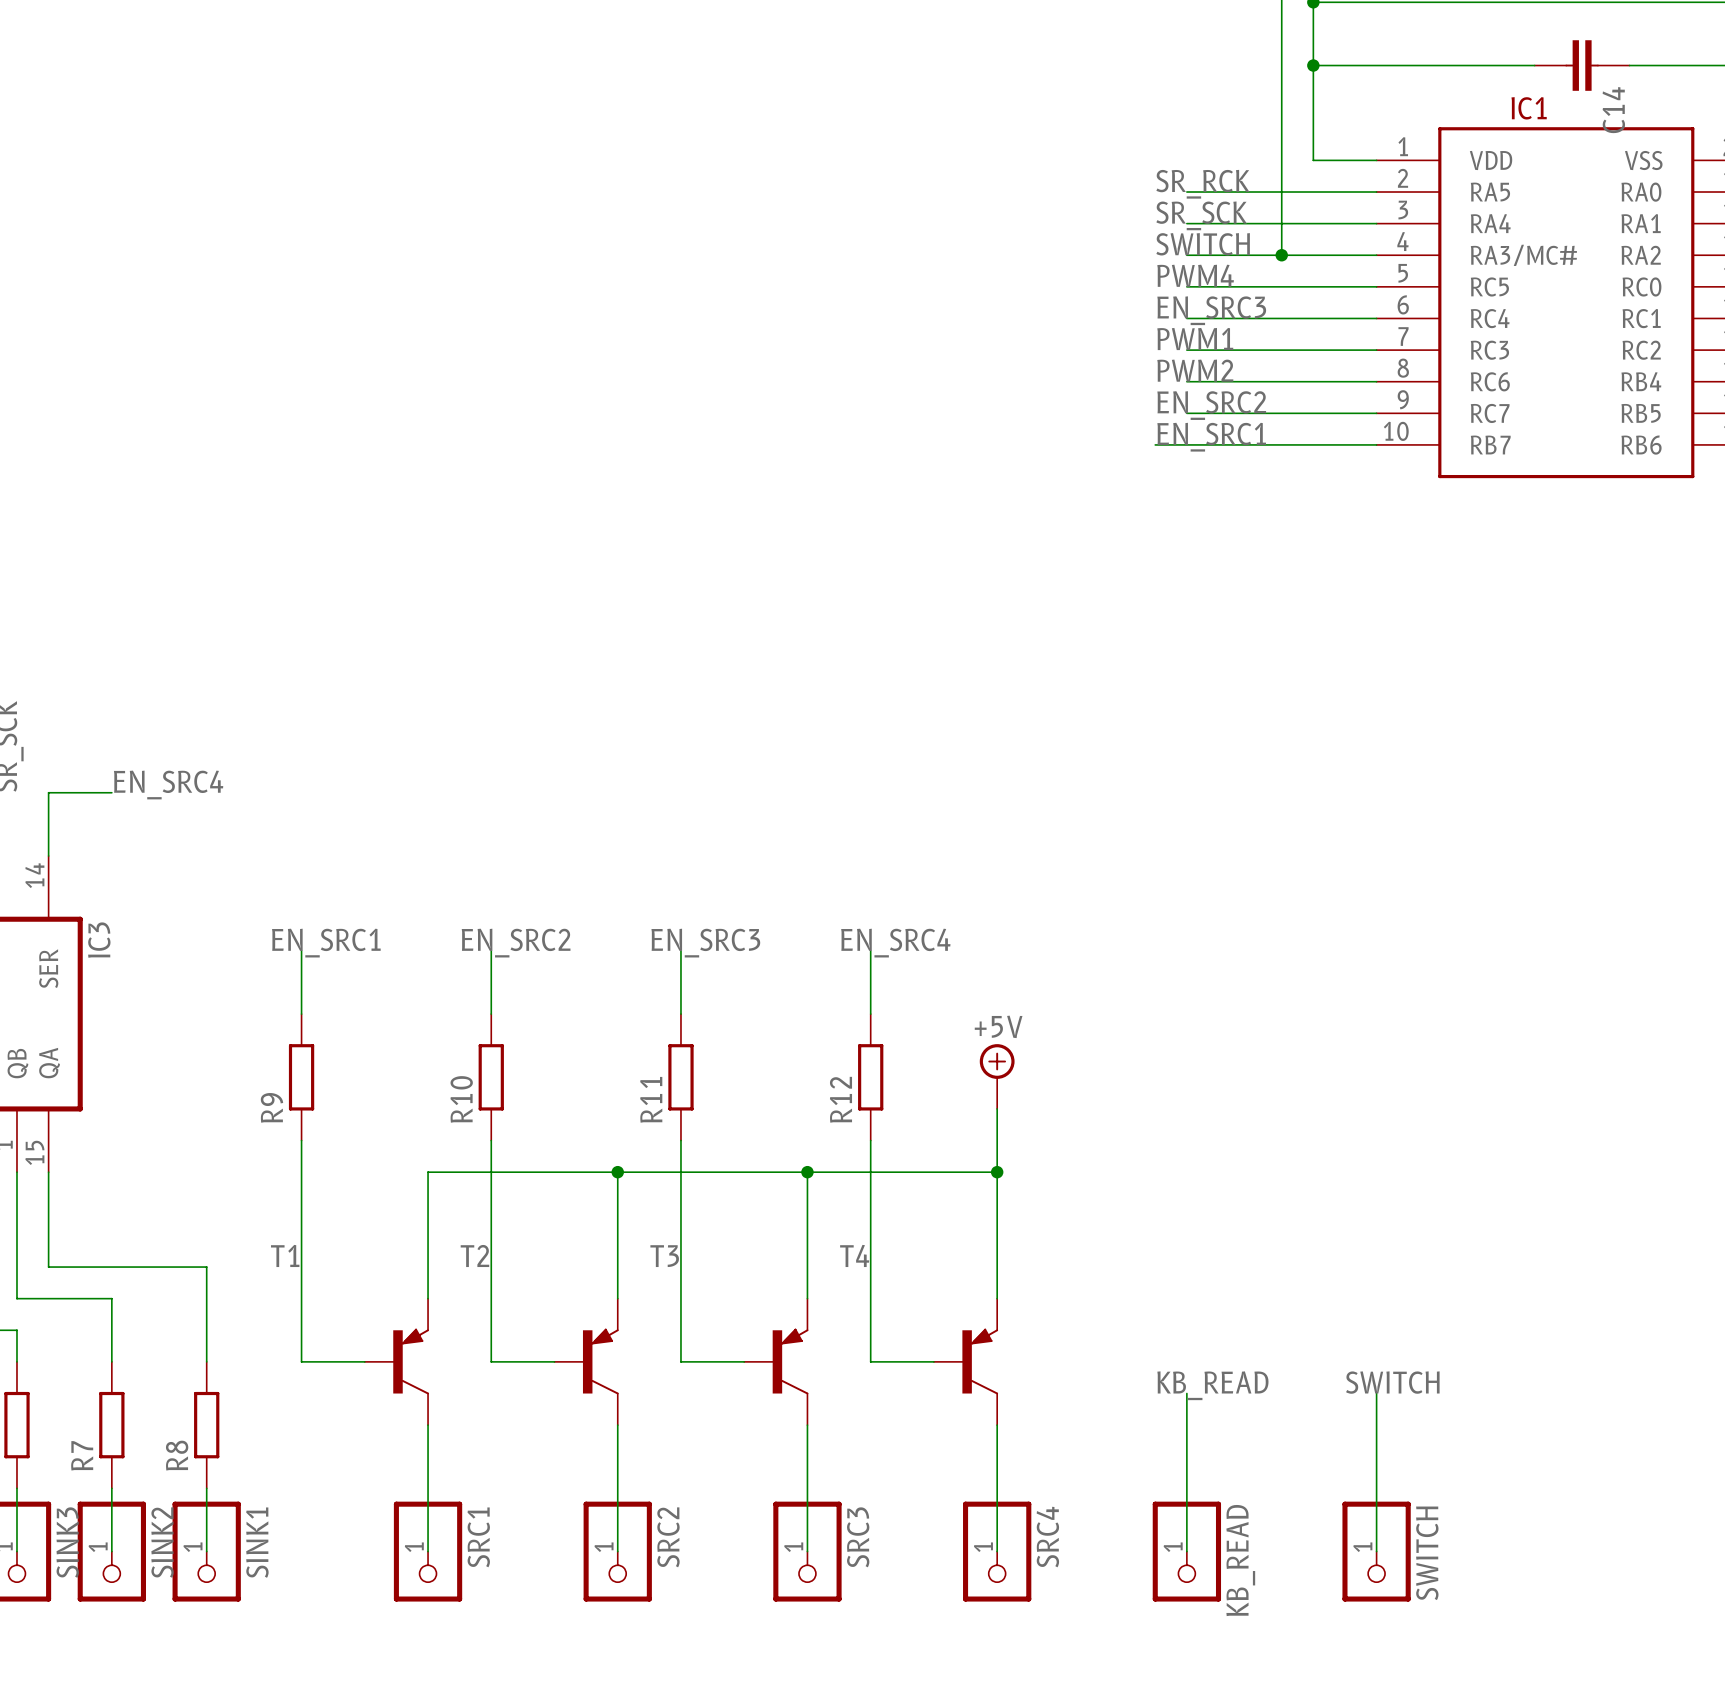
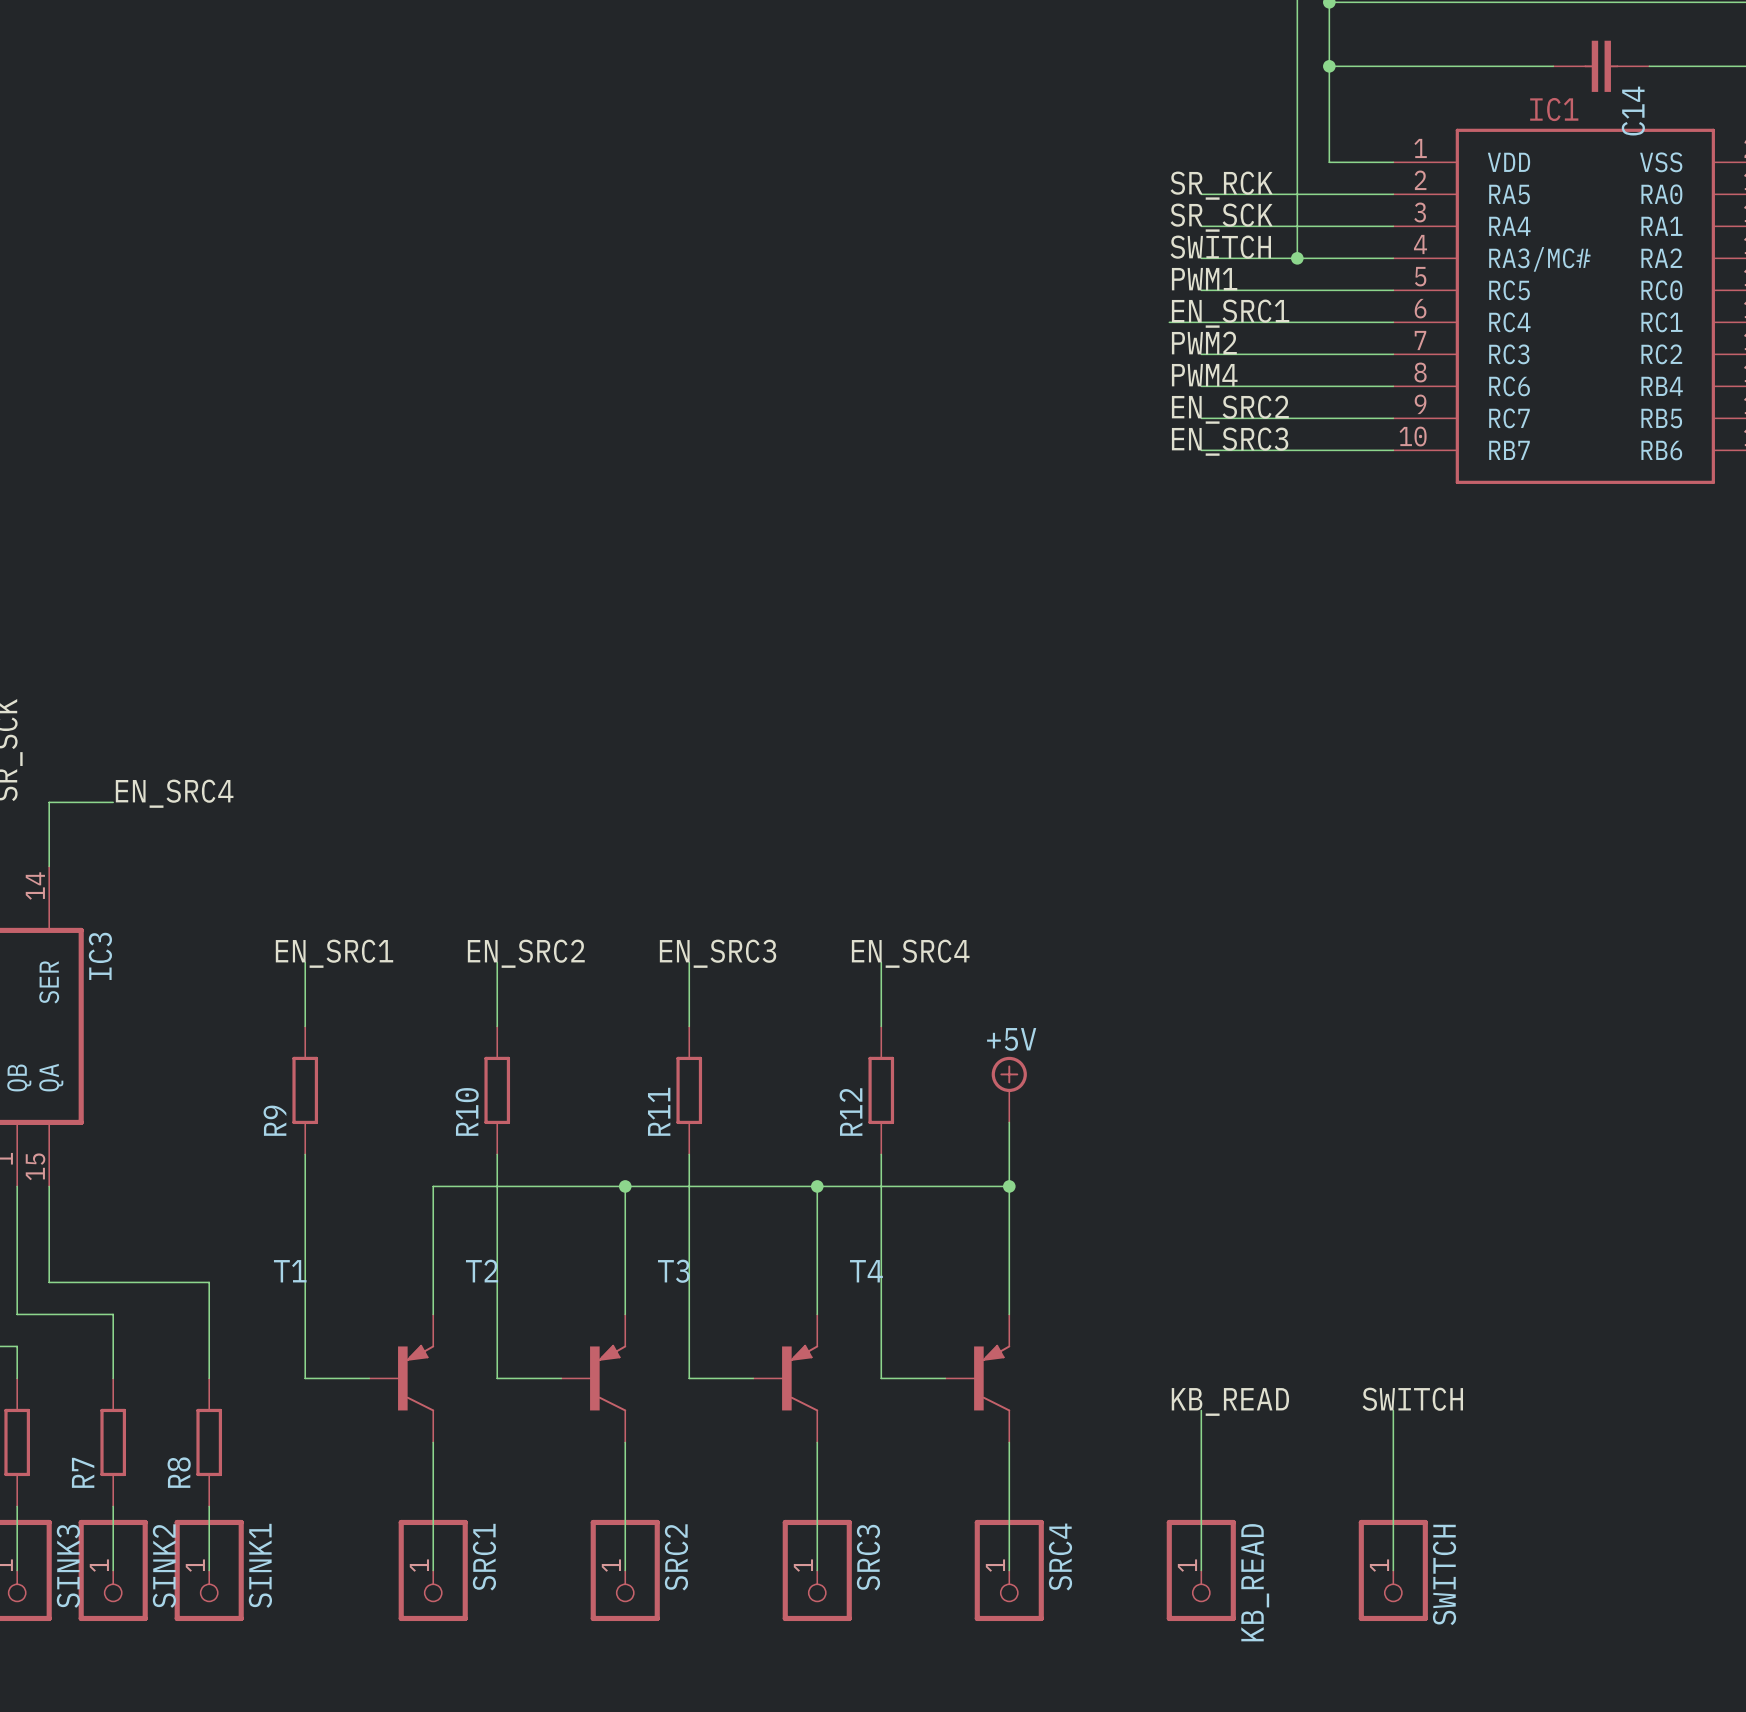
label: PWM4 (1195, 275) -> PWM1 (1204, 279)
label: EN_SRC3 (1211, 310) -> EN_SRC1 (1230, 313)
label: PWM1 (1195, 339) -> PWM2 (1204, 342)
label: PWM2 (1195, 370) -> PWM4 (1204, 375)
label: EN_SRC1 (1211, 437) -> EN_SRC3 (1230, 441)
wire: (1155, 444) (1186, 444) -> (1169, 322) (1201, 322)

